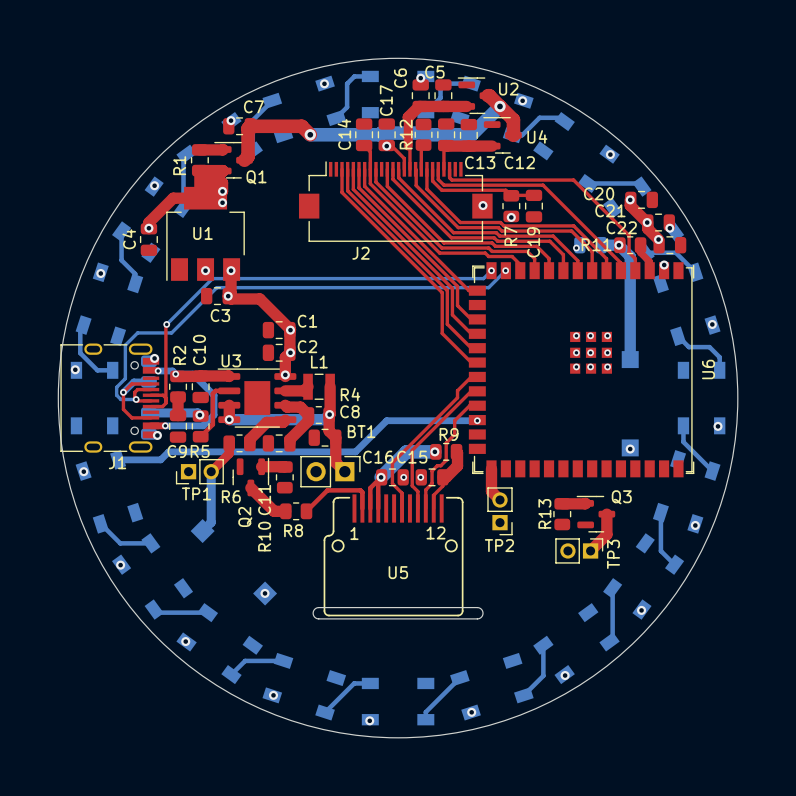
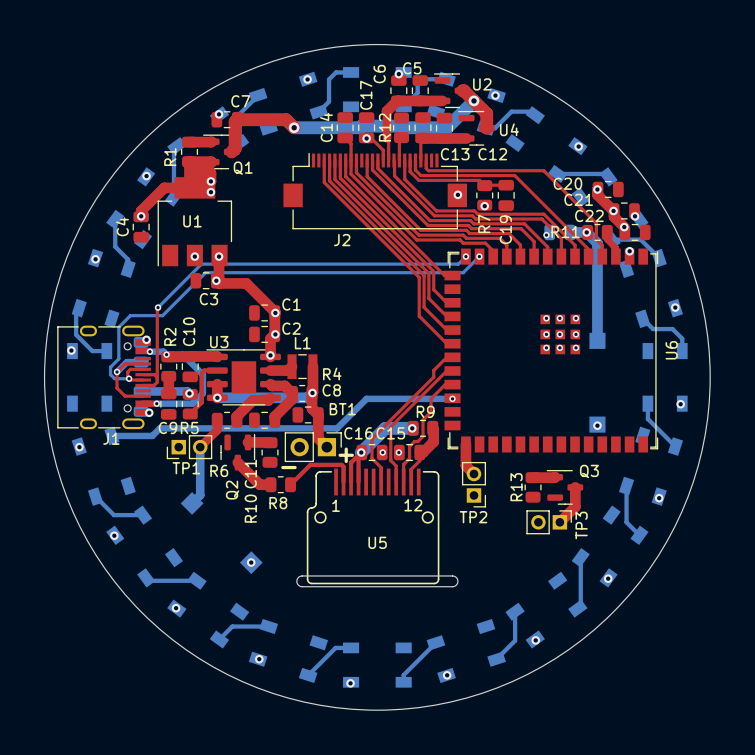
round board edge size: [57, 57, 739, 739] -> [44, 44, 711, 711]
text: none -> + (346, 455)
text: none -> - (288, 467)

